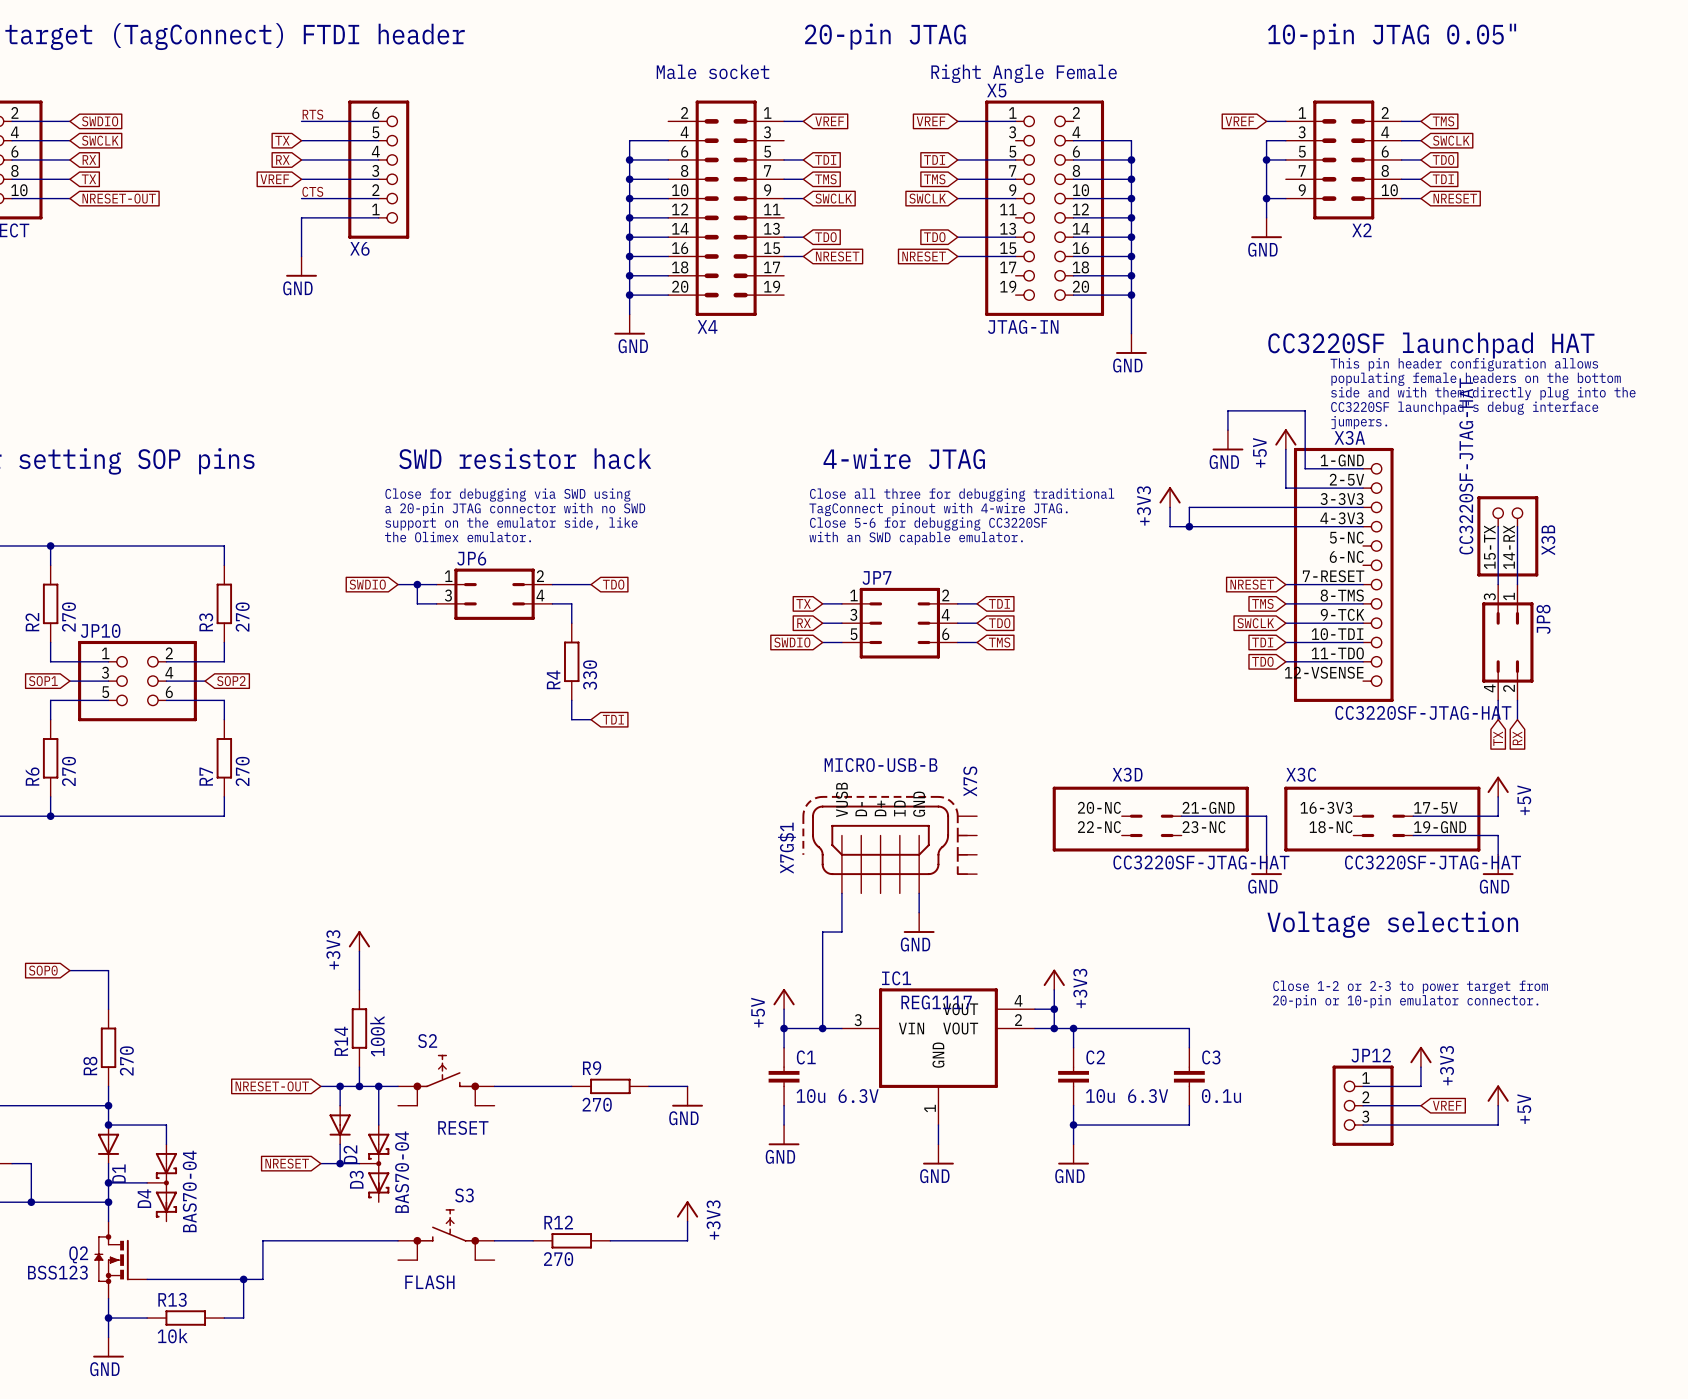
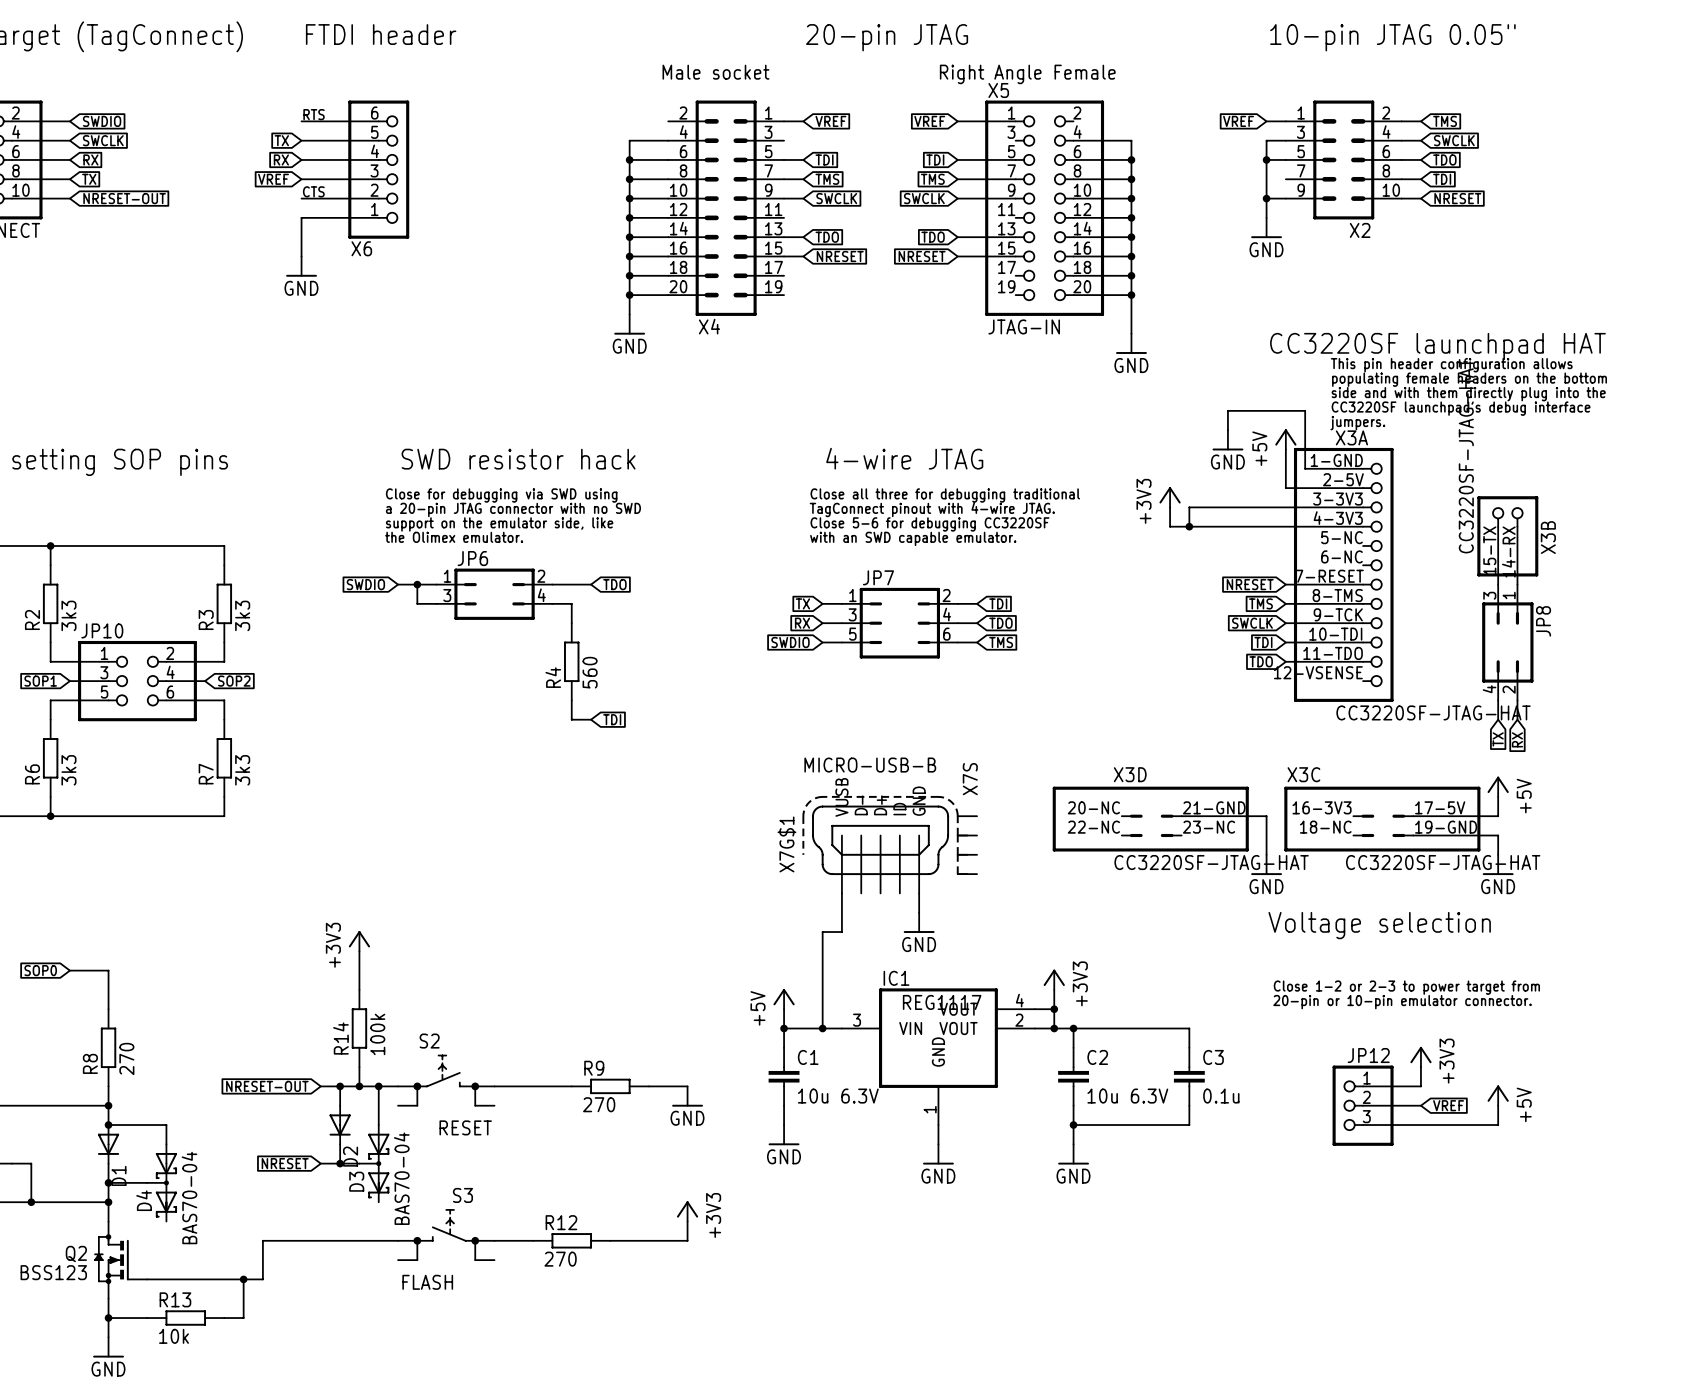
R2 value: 270 (68, 617) -> 3k3 (68, 615)
R3 value: 270 (242, 617) -> 3k3 (242, 615)
R4 value: 330 (590, 675) -> 560 (590, 672)
R6 value: 270 (68, 771) -> 3k3 (68, 770)
R7 value: 270 (242, 771) -> 3k3 (242, 770)

